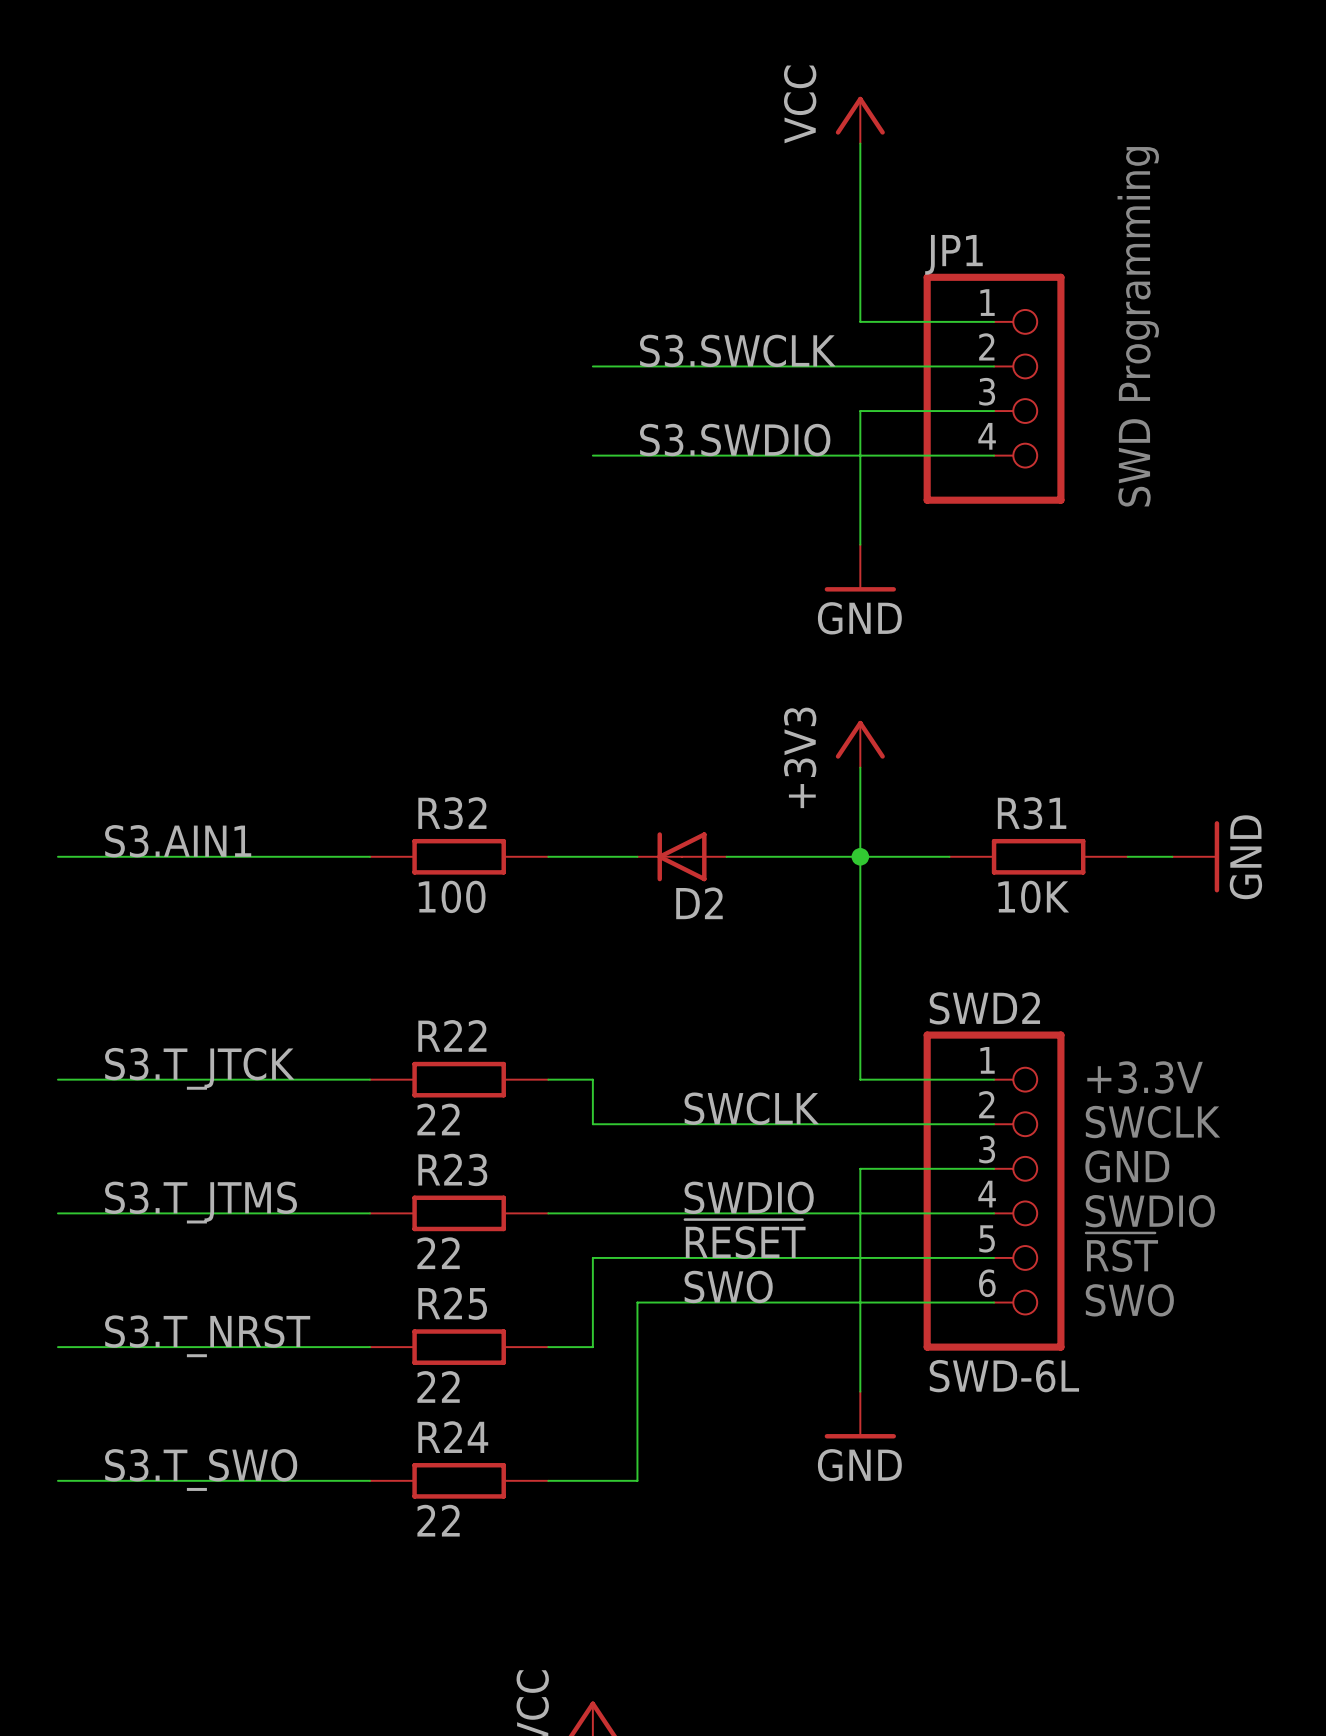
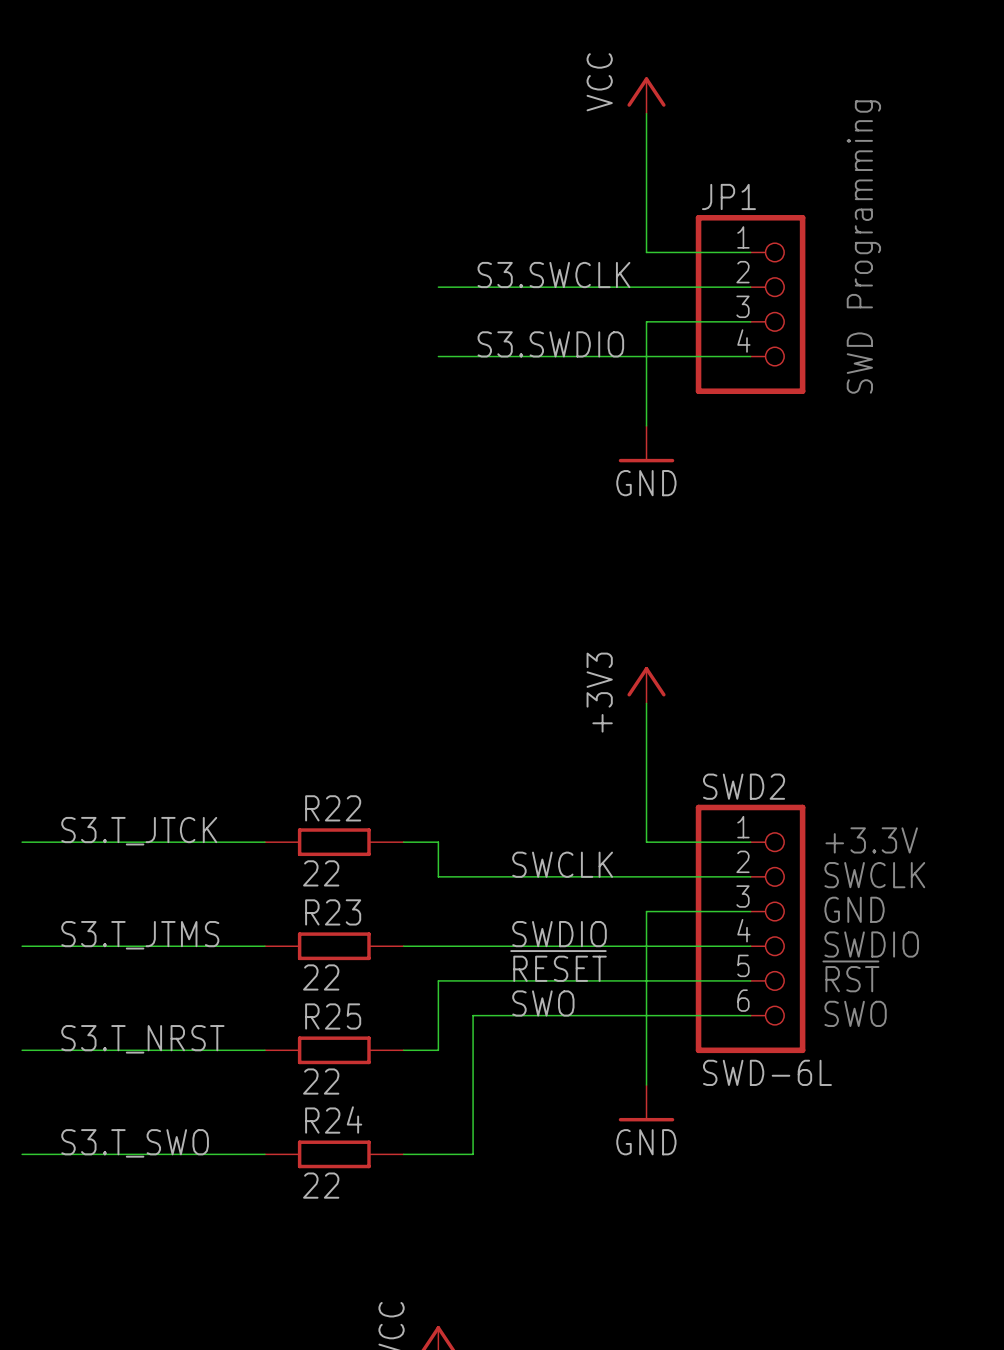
power symbol position: +3V3 (860, 744) -> +3V3 (646, 685)
wire: (860, 767) (860, 901) -> none
label: S3.AIN1 (178, 841) -> none
wire: (57, 856) (370, 856) -> none
R32: 100 (459, 856) -> none
wire: (548, 856) (637, 856) -> none
D2: (682, 856) -> none
wire: (726, 856) (949, 856) -> none
junction: (860, 856) -> none
R31: 10K (1038, 856) -> none
wire: (1127, 856) (1172, 856) -> none
power symbol: GND (1195, 856) -> none

